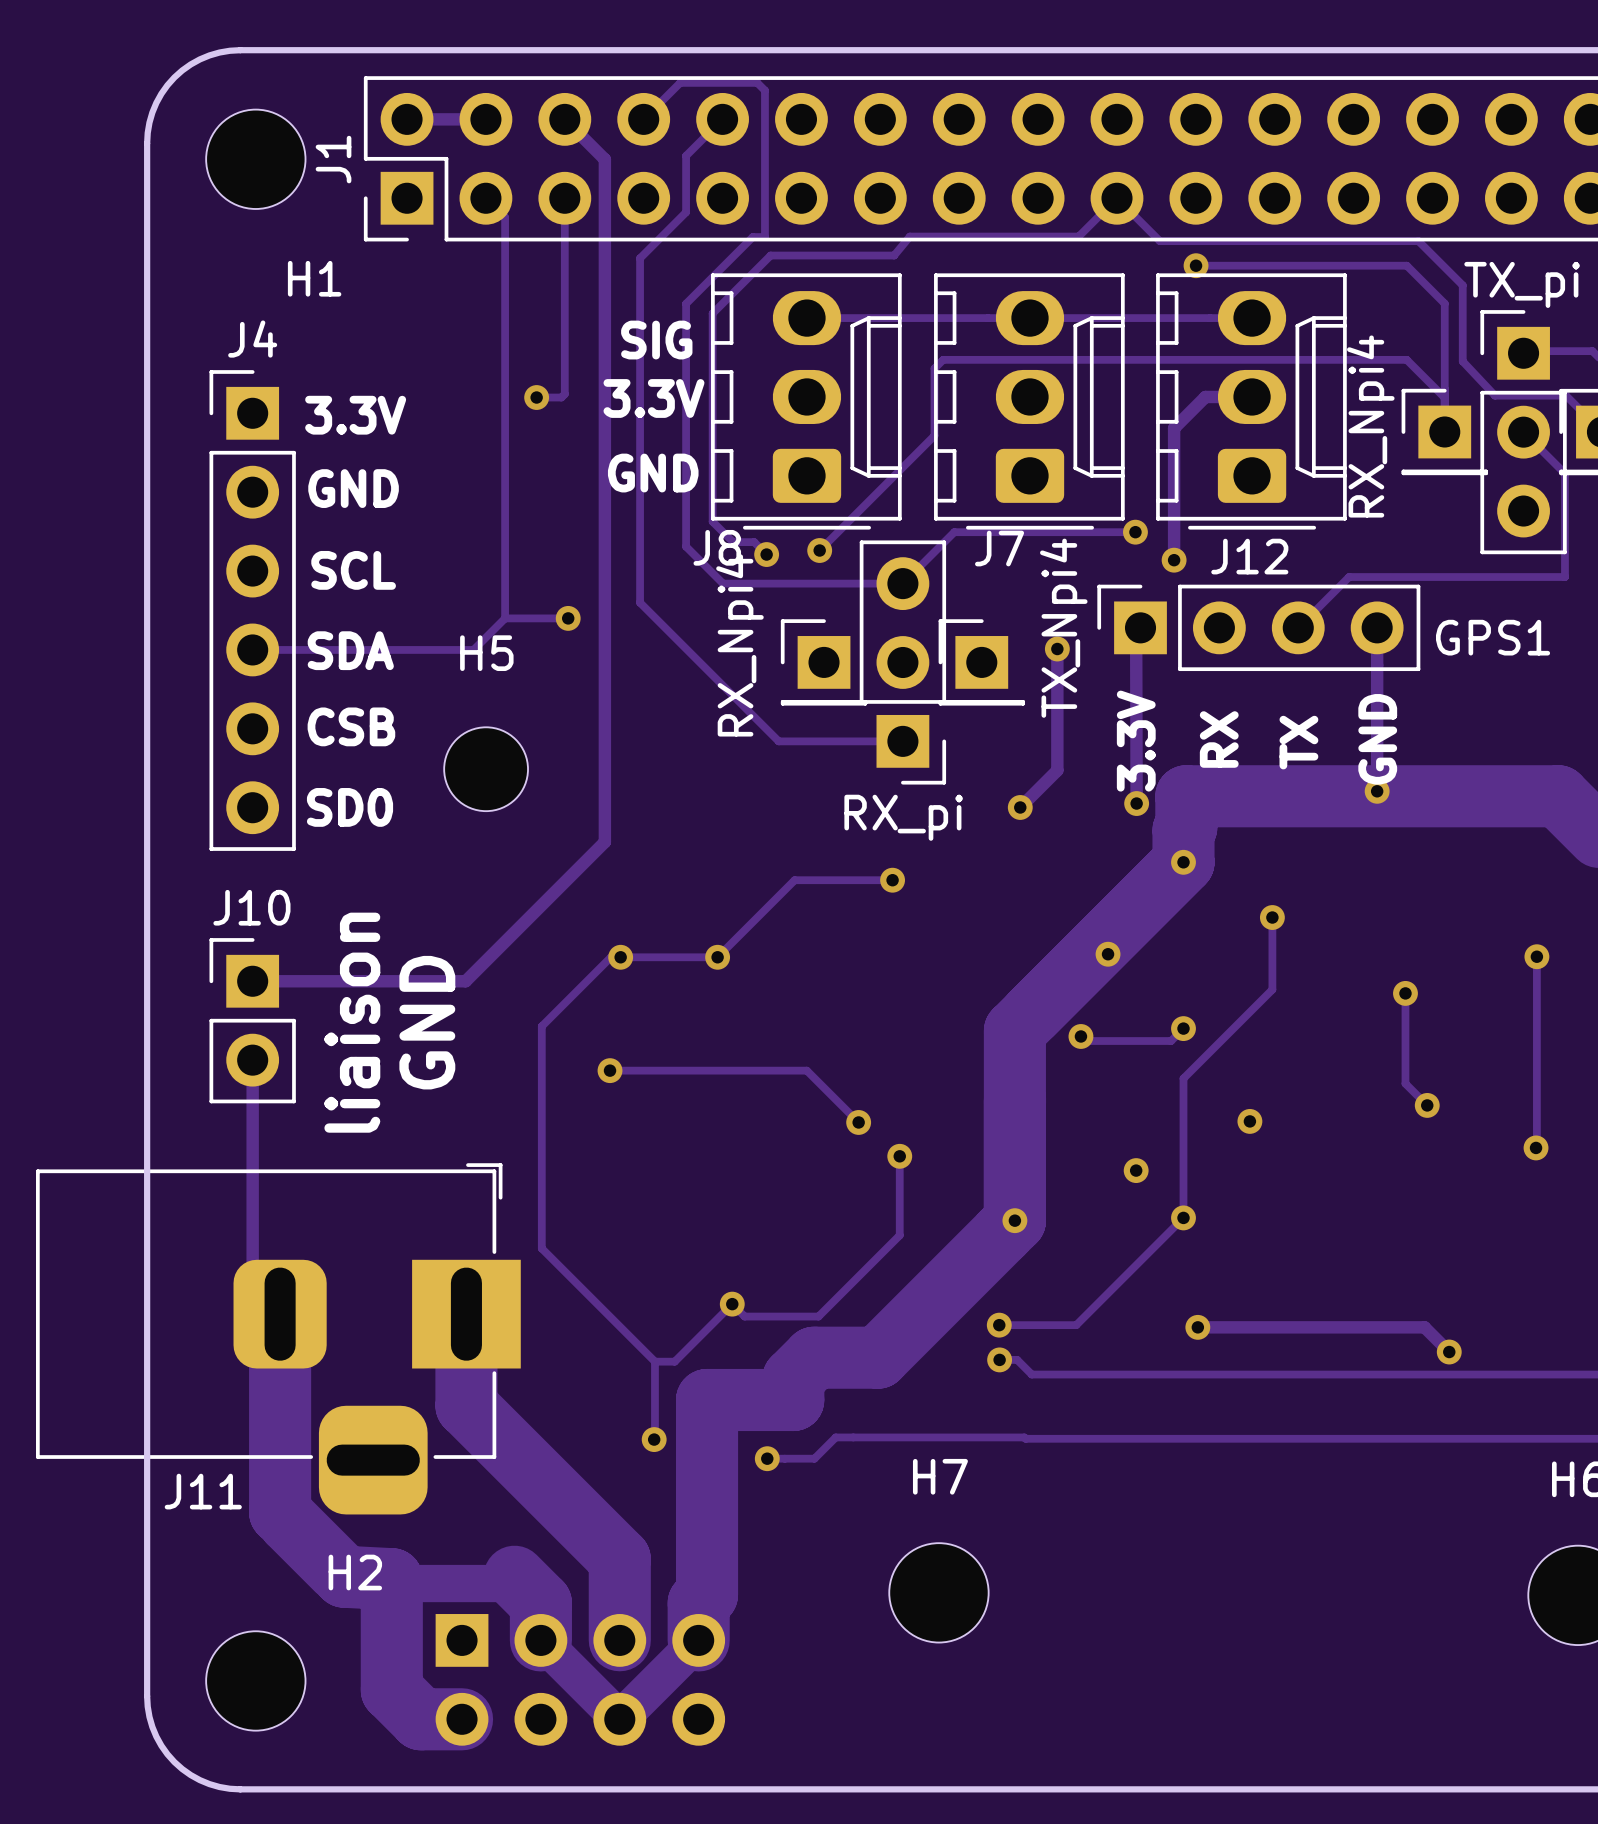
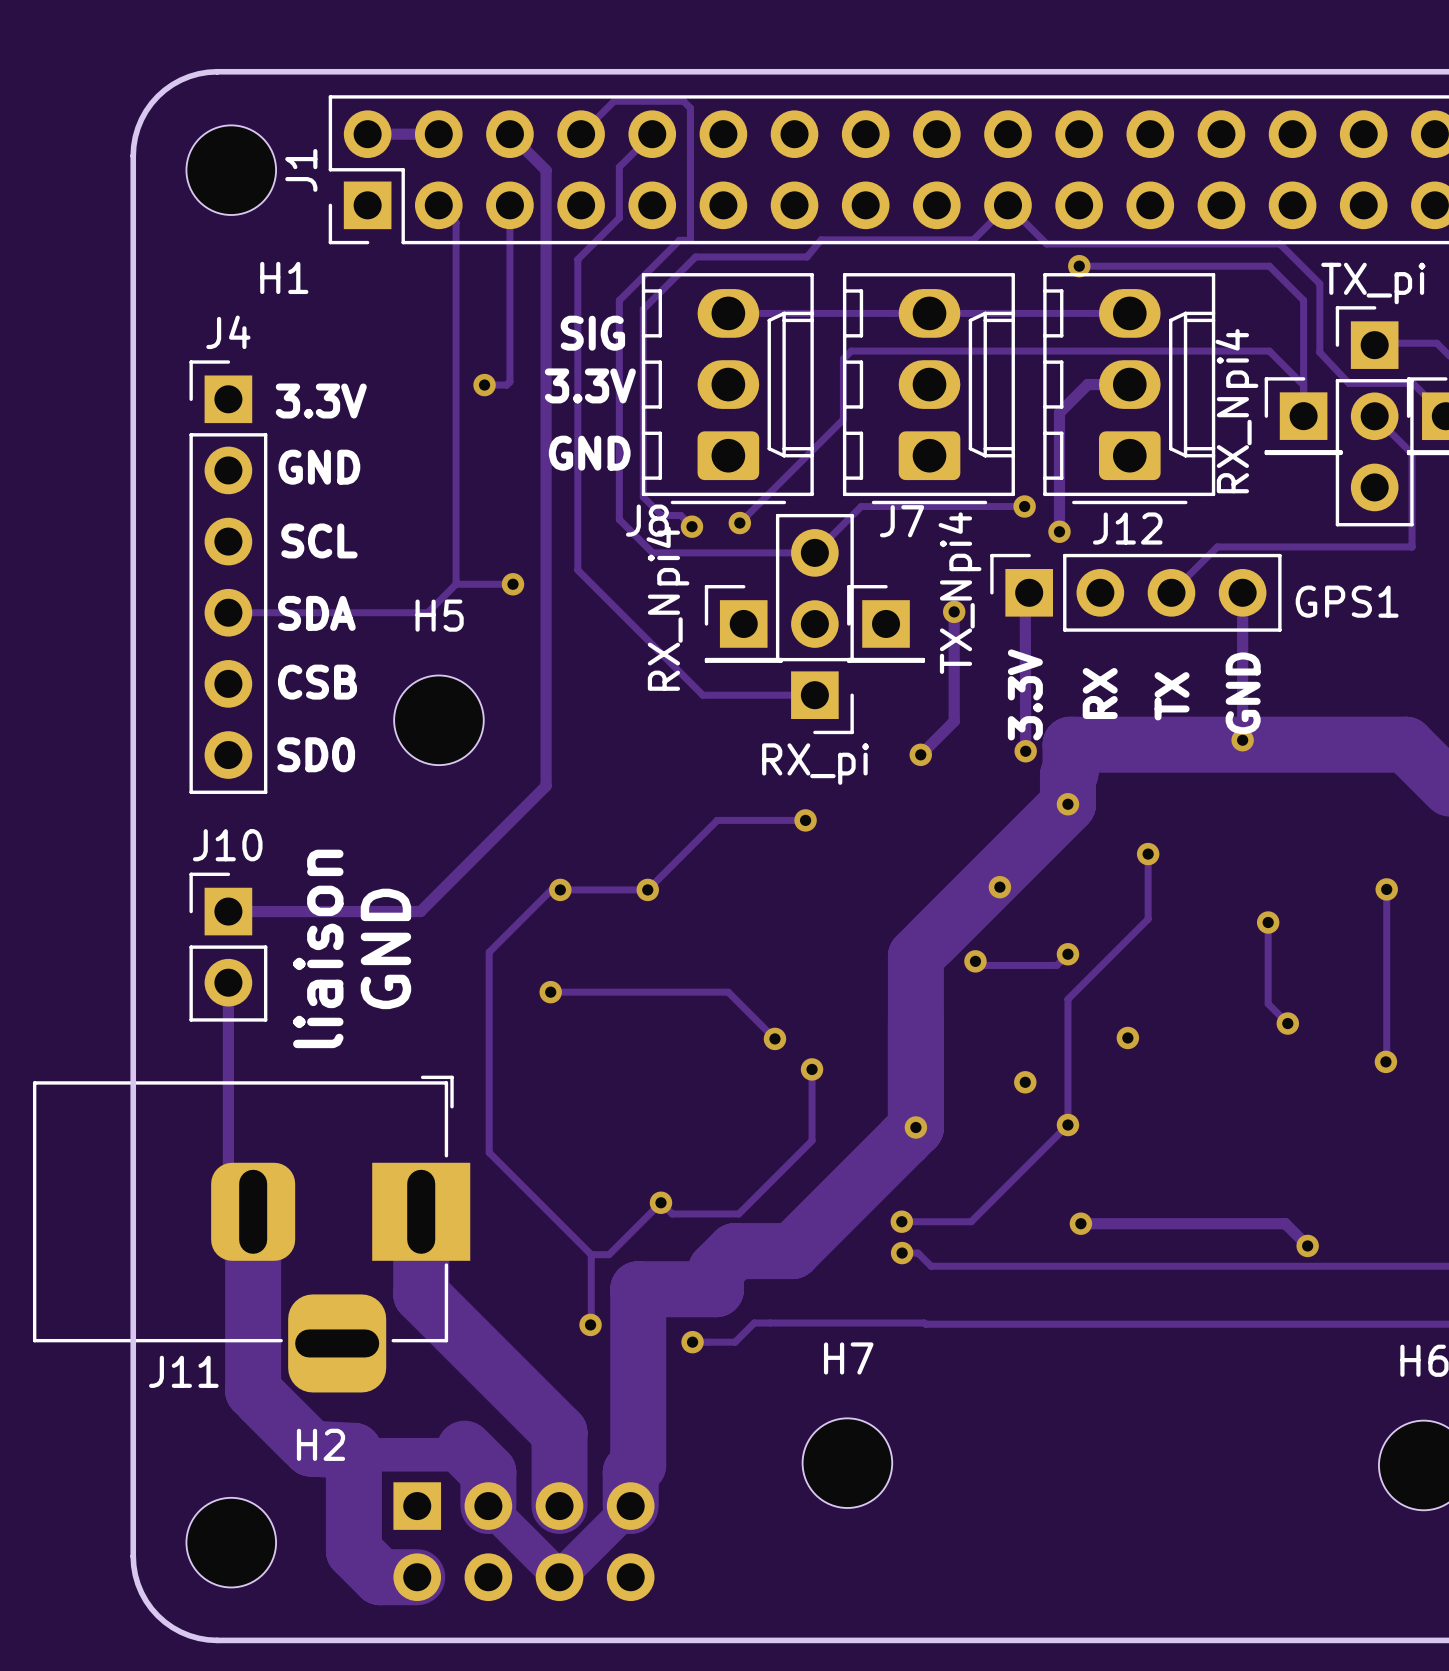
H5 footprint: [444, 727, 529, 812] -> [394, 675, 484, 766]

